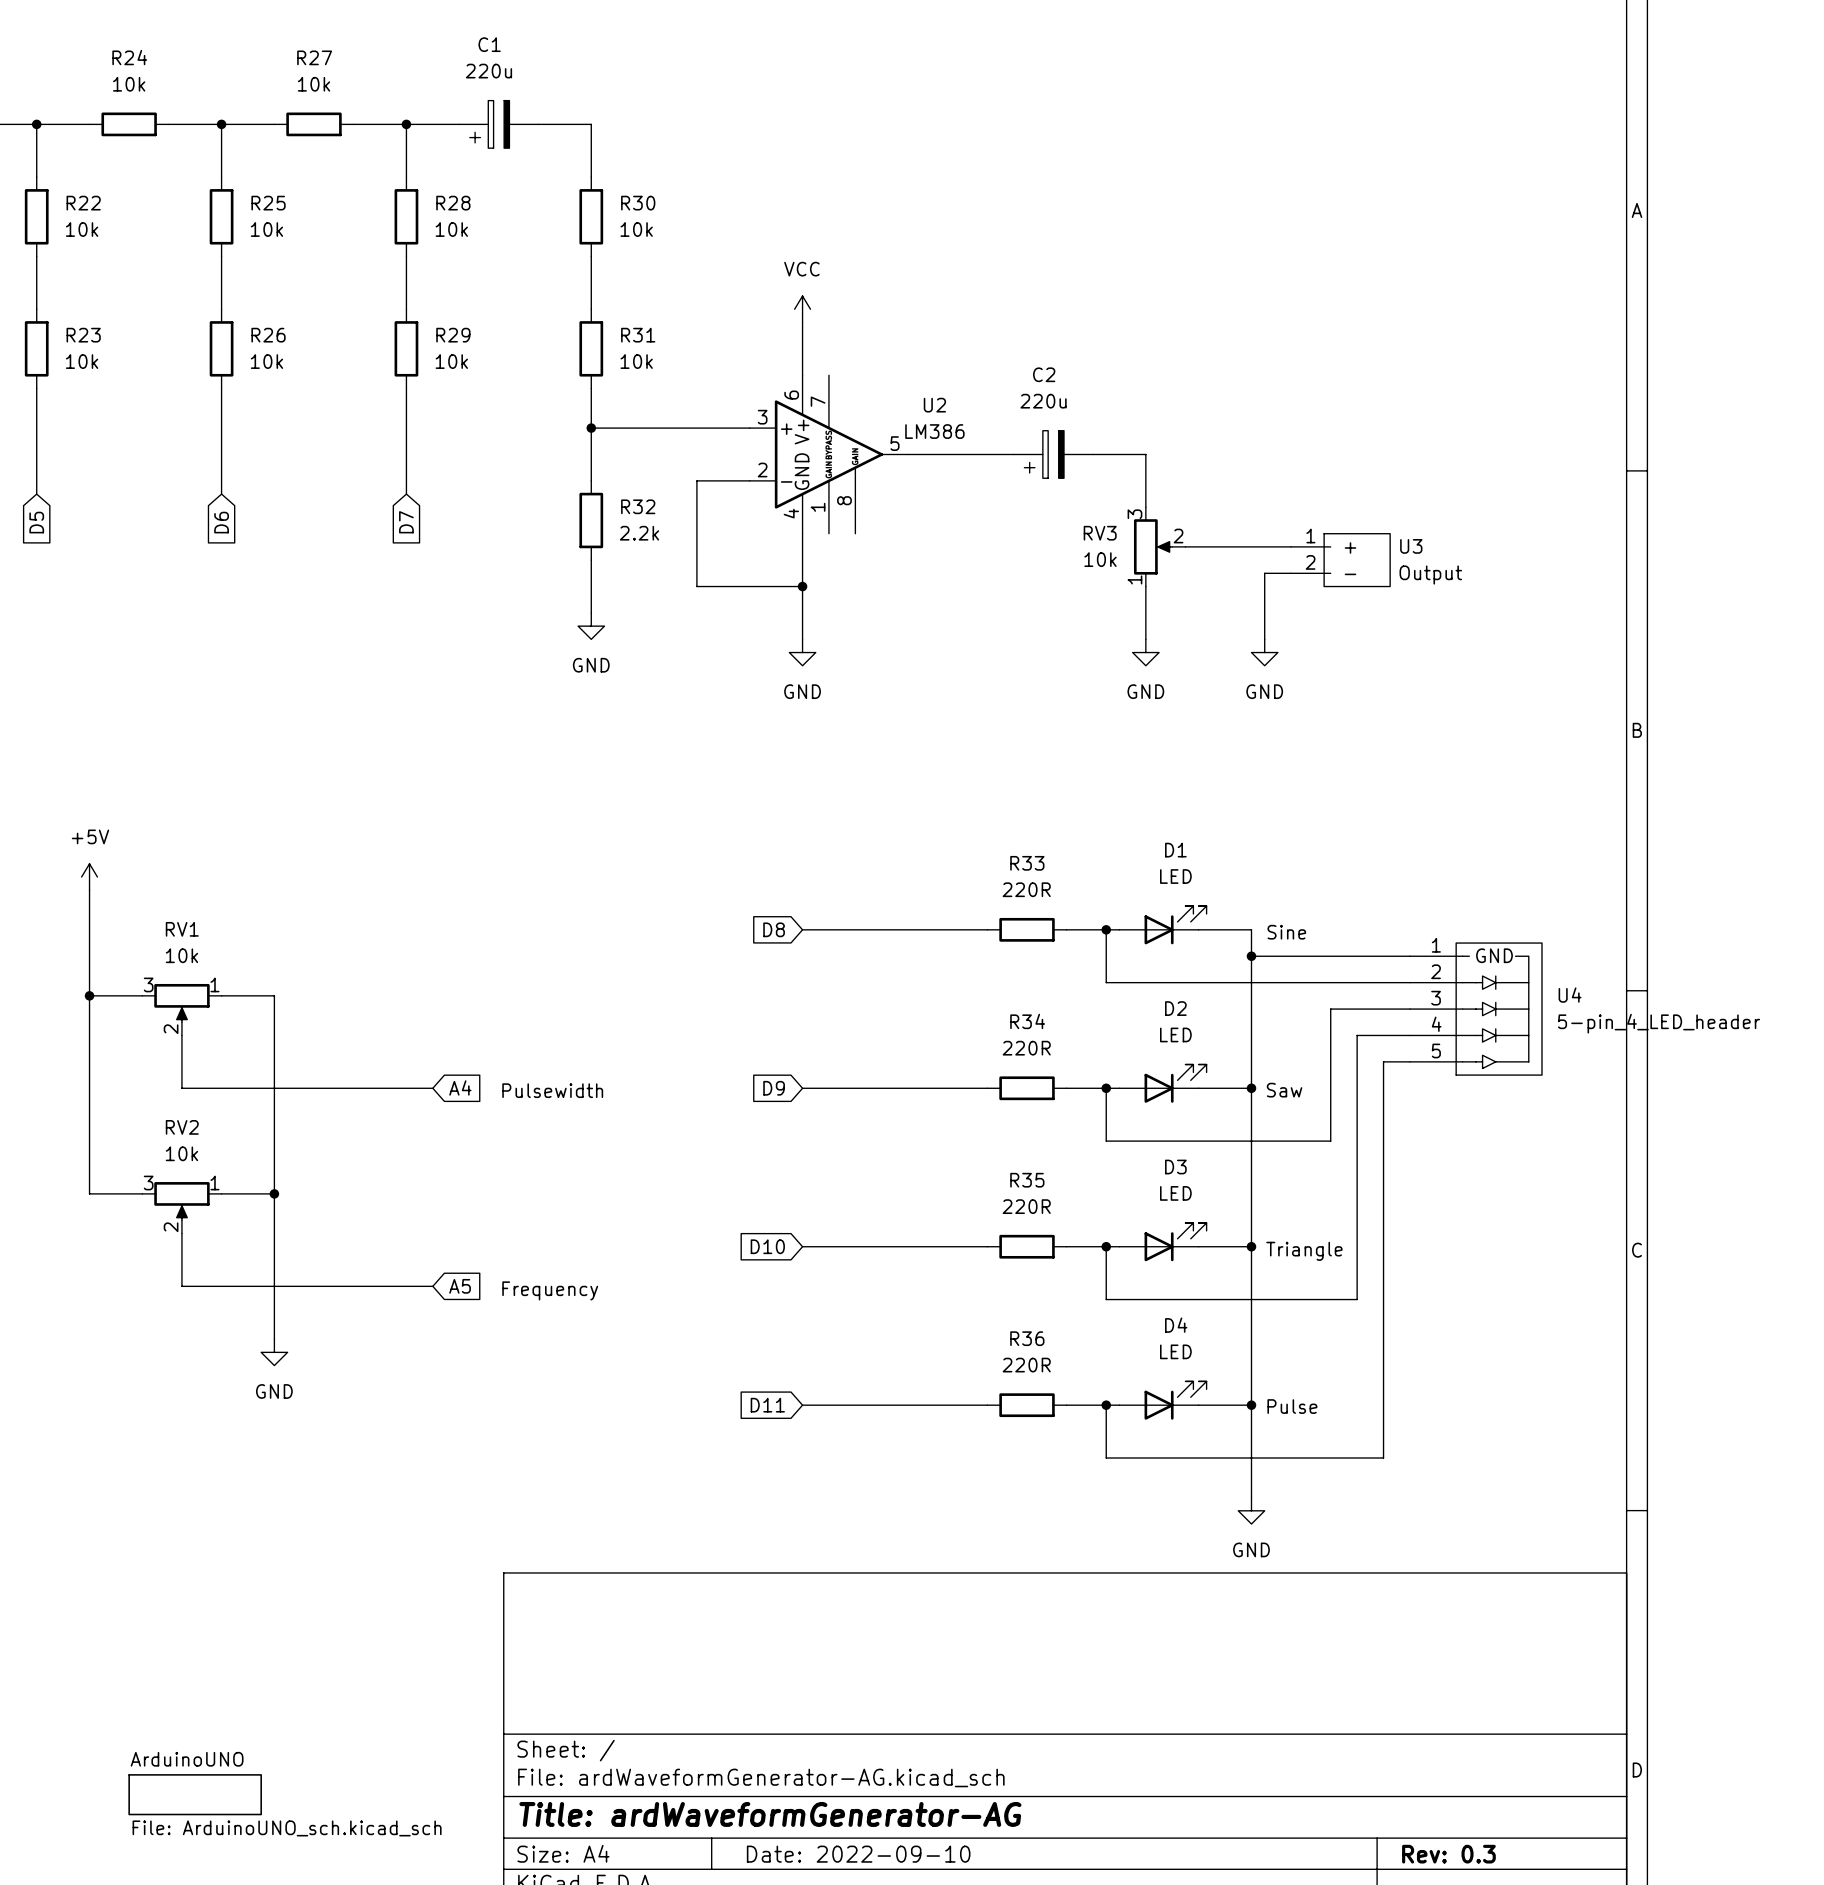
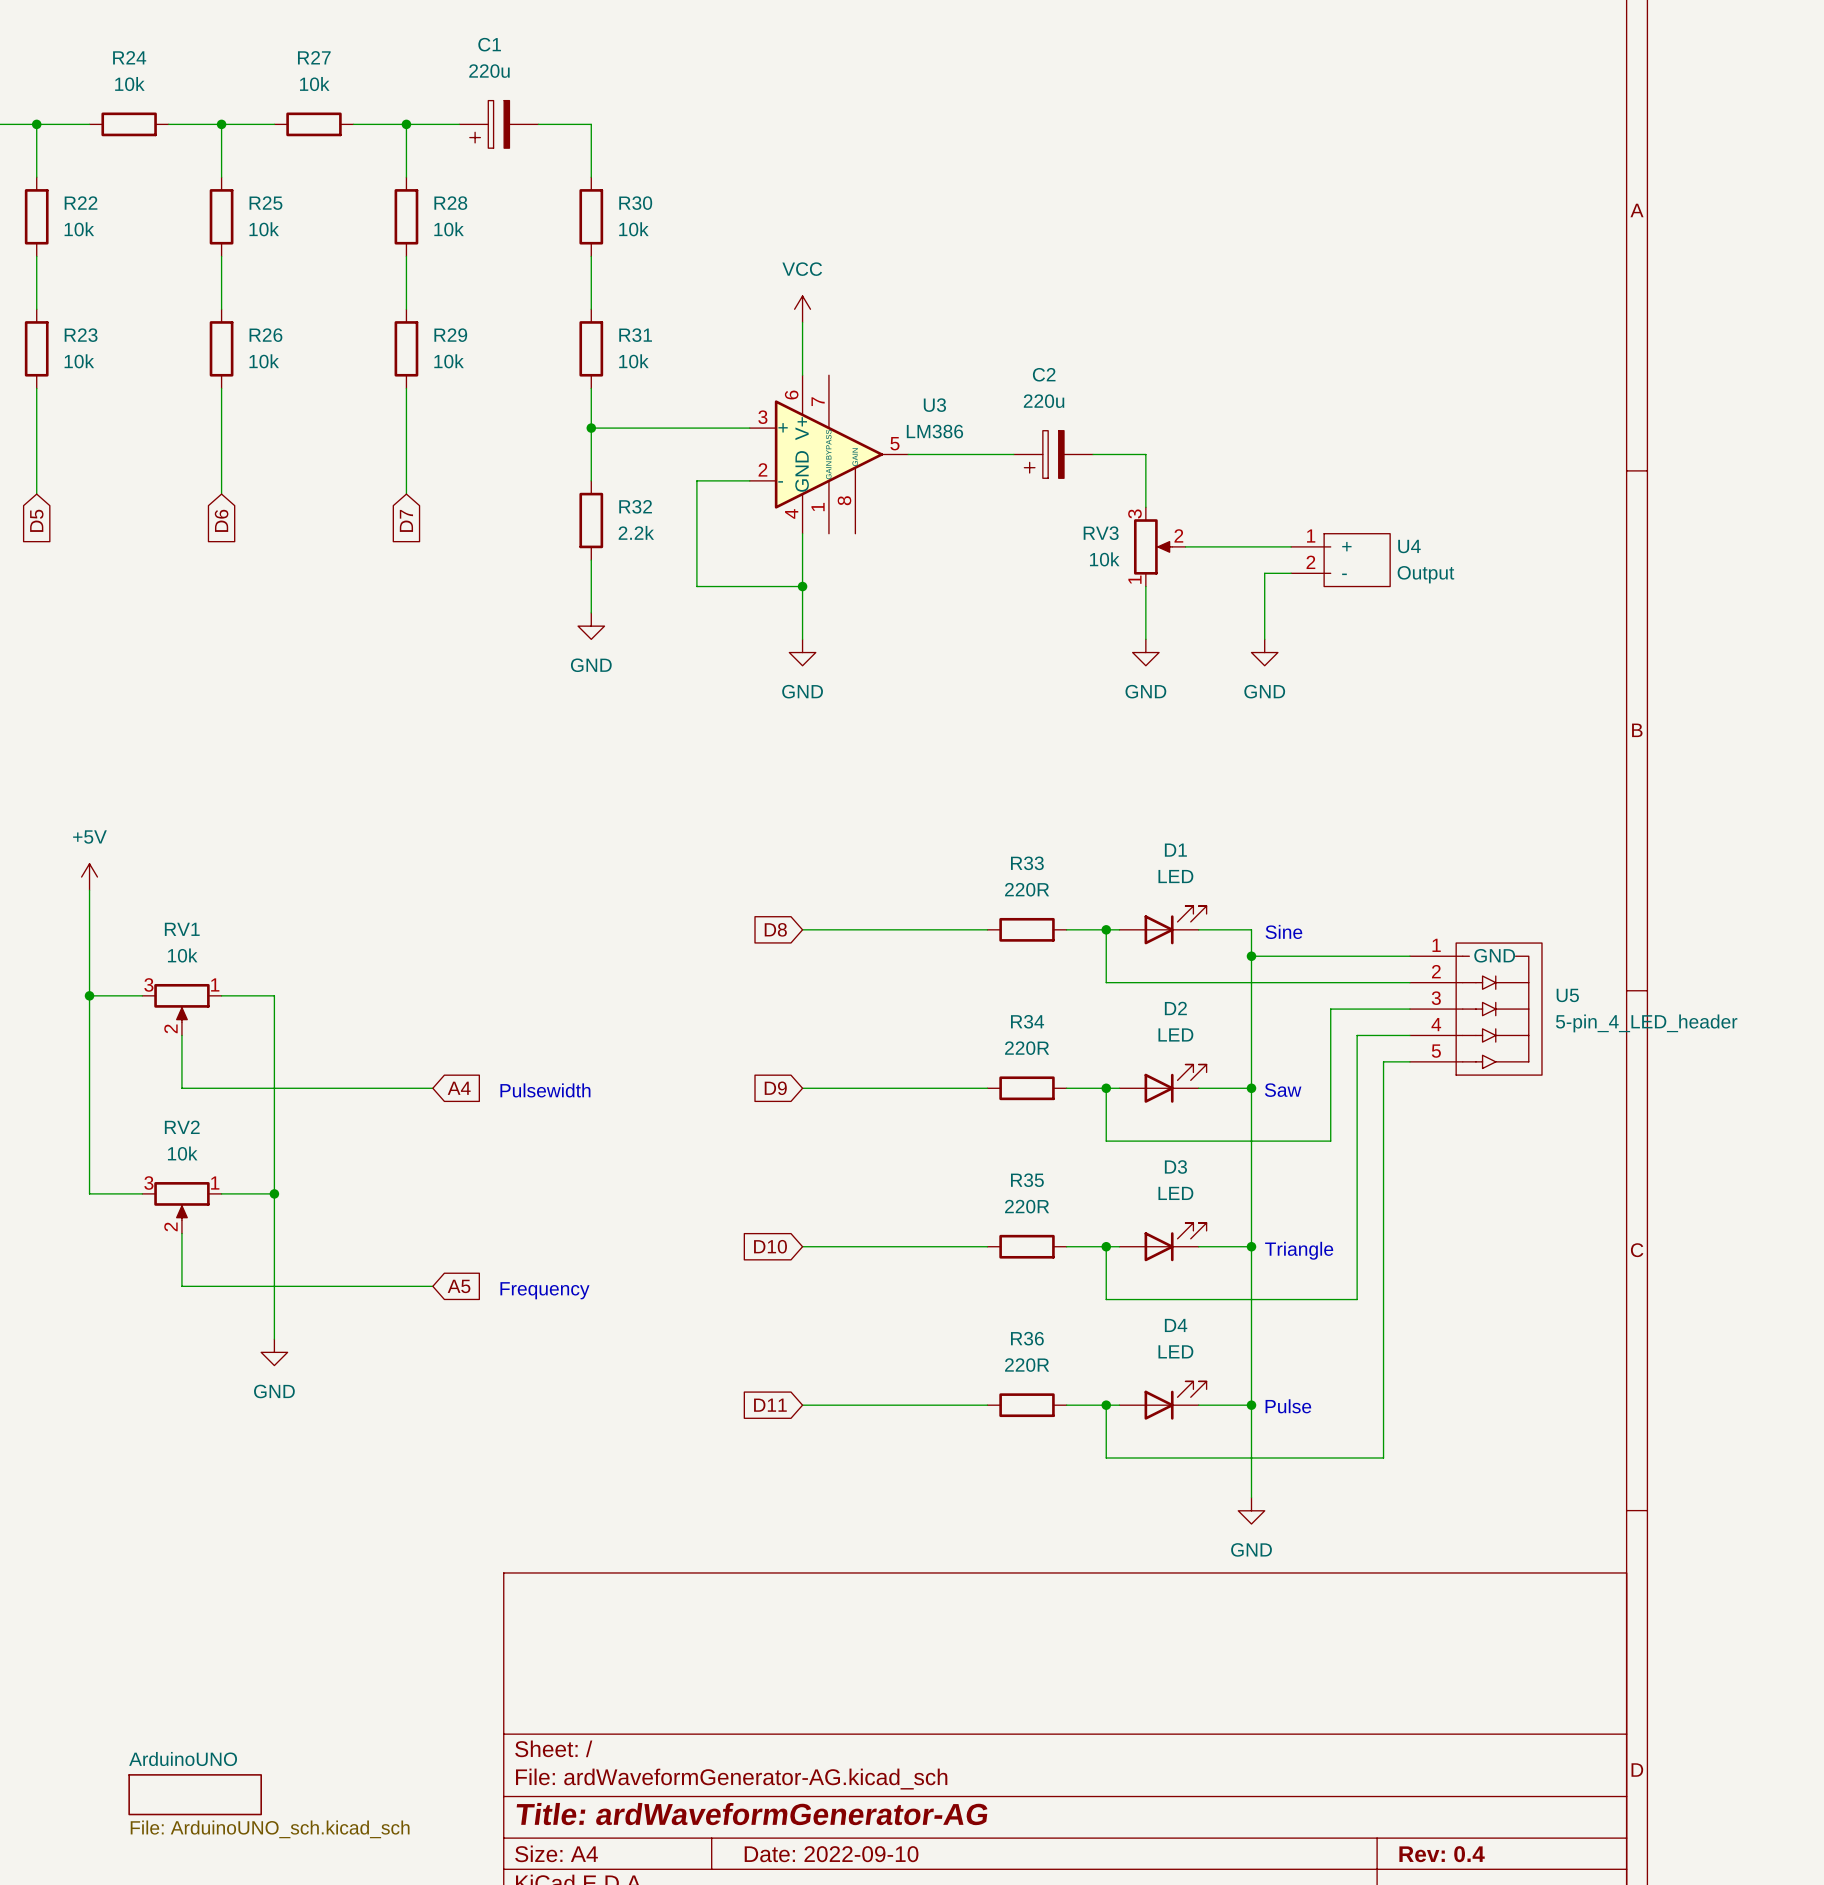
U2 name: U2 (934, 405) -> U3 (934, 405)
U3 name: U3 (1411, 546) -> U4 (1409, 546)
U4 name: U4 (1570, 995) -> U5 (1567, 995)
title block: Rev: 0.3 (1448, 1854) -> Rev: 0.4 (1442, 1854)

